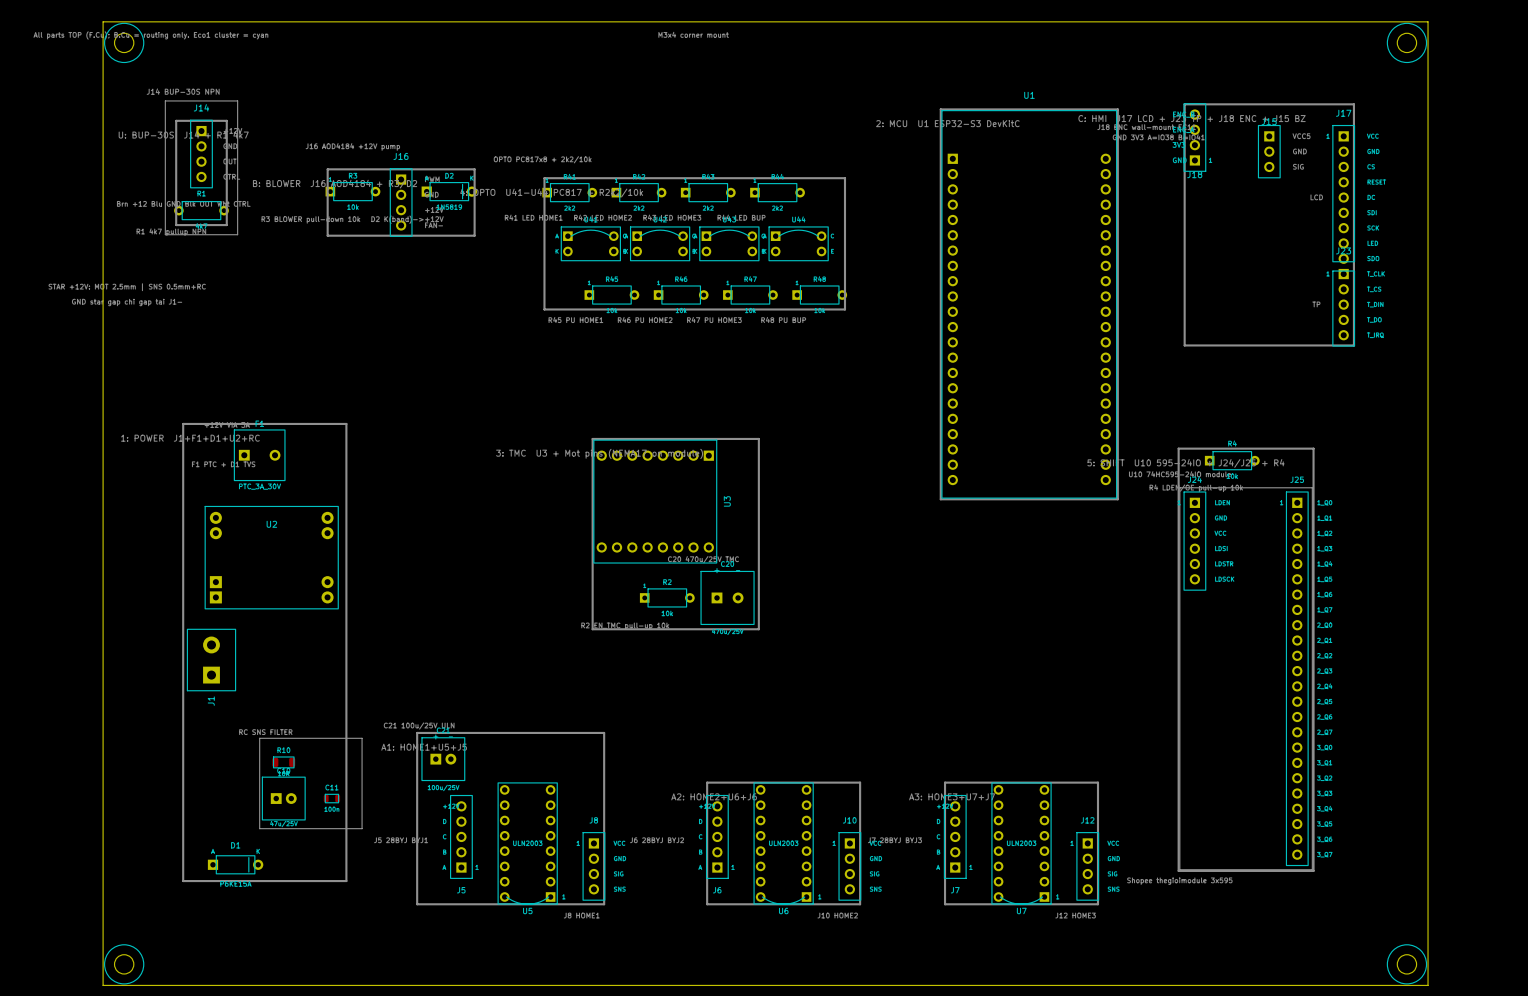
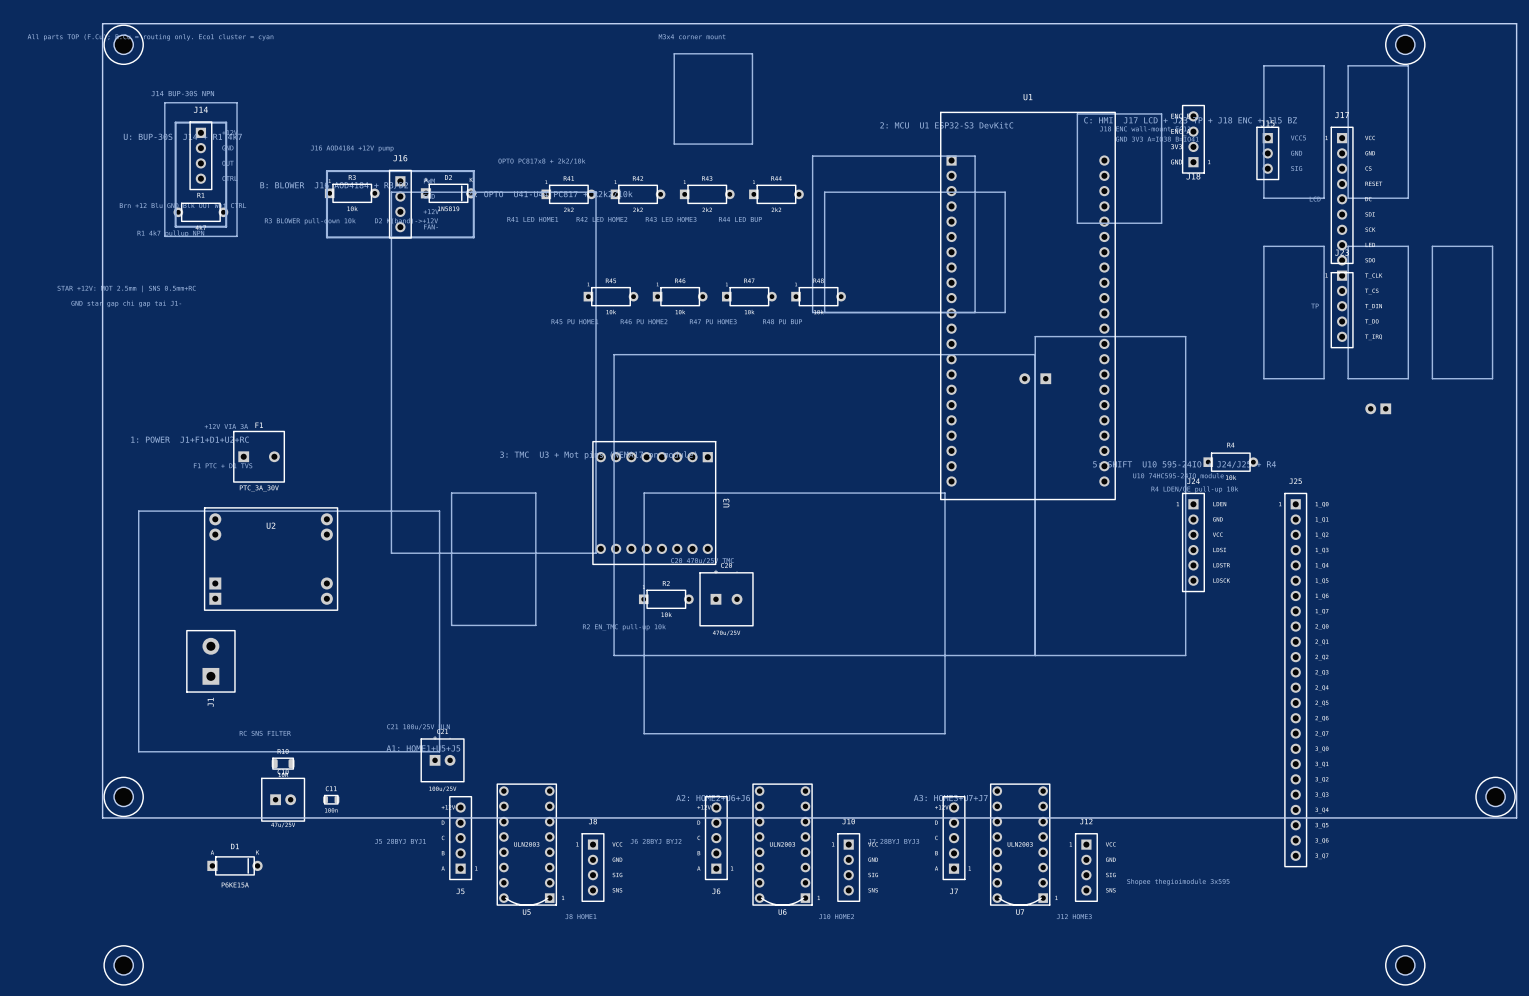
board edge: (1428, 21) (1428, 985) (103, 985) (103, 816) -> (1426, 23) (1516, 23) (1516, 817) (102, 817)
line: none -> (674, 53) (752, 53) (752, 144) (674, 144) (674, 53)
line: none -> (1263, 65) (1324, 65) (1324, 198) (1263, 198) (1263, 65)
line: none -> (1348, 65) (1408, 65) (1408, 198) (1348, 198) (1348, 65)
line: (1184, 104) (1353, 104) (1353, 345) (1184, 345) (1184, 104) -> none
line: (940, 109) (1117, 109) (1117, 499) (940, 499) (940, 109) -> none
line: none -> (1077, 113) (1161, 113) (1161, 223) (1077, 223) (1077, 113)
line: (544, 178) (844, 178) (844, 309) (544, 309) (544, 178) -> none
line: none -> (391, 192) (596, 192) (596, 553) (391, 553) (391, 192)
part: (590, 243) -> none
part: (660, 243) -> none
part: (729, 243) -> none
part: (798, 243) -> none
line: none -> (1263, 246) (1263, 378) (1324, 378) (1324, 246) (1263, 246)
line: none -> (1348, 246) (1408, 246) (1408, 378) (1348, 378) (1348, 246)
line: none -> (1432, 246) (1492, 246) (1492, 378) (1432, 378) (1432, 246)
line: none -> (824, 312) (824, 192) (1005, 192) (1005, 312) (812, 312) (812, 156) (975, 156) (975, 312)
line: none -> (1035, 354) (614, 354) (614, 655) (1185, 655) (1185, 336) (1035, 336) (1035, 655)
part: none -> (1035, 378)
part: none -> (1378, 408)
line: (183, 423) (346, 423) (346, 881) (183, 881) (183, 423) -> none
line: (592, 438) (758, 438) (758, 629) (592, 629) (592, 438) -> none
line: (1178, 448) (1313, 448) (1313, 870) (1178, 870) (1178, 448) -> none
line: (1179, 487) (1312, 487) (1312, 869) (1179, 869) (1179, 487) -> none
line: none -> (451, 493) (535, 493) (535, 625) (451, 625) (451, 493)
line: none -> (644, 493) (945, 493) (945, 733) (644, 733) (644, 493)
line: none -> (138, 511) (439, 511) (439, 751) (138, 751) (138, 511)
line: (417, 732) (604, 732) (604, 904) (417, 904) (417, 732) -> none
line: (259, 738) (362, 738) (362, 828) (259, 828) (259, 738) -> none
line: (707, 782) (860, 782) (860, 904) (707, 904) (707, 782) -> none
line: (945, 782) (1097, 782) (1097, 904) (945, 904) (945, 782) -> none
part: none -> (123, 796)
part: none -> (1495, 796)

